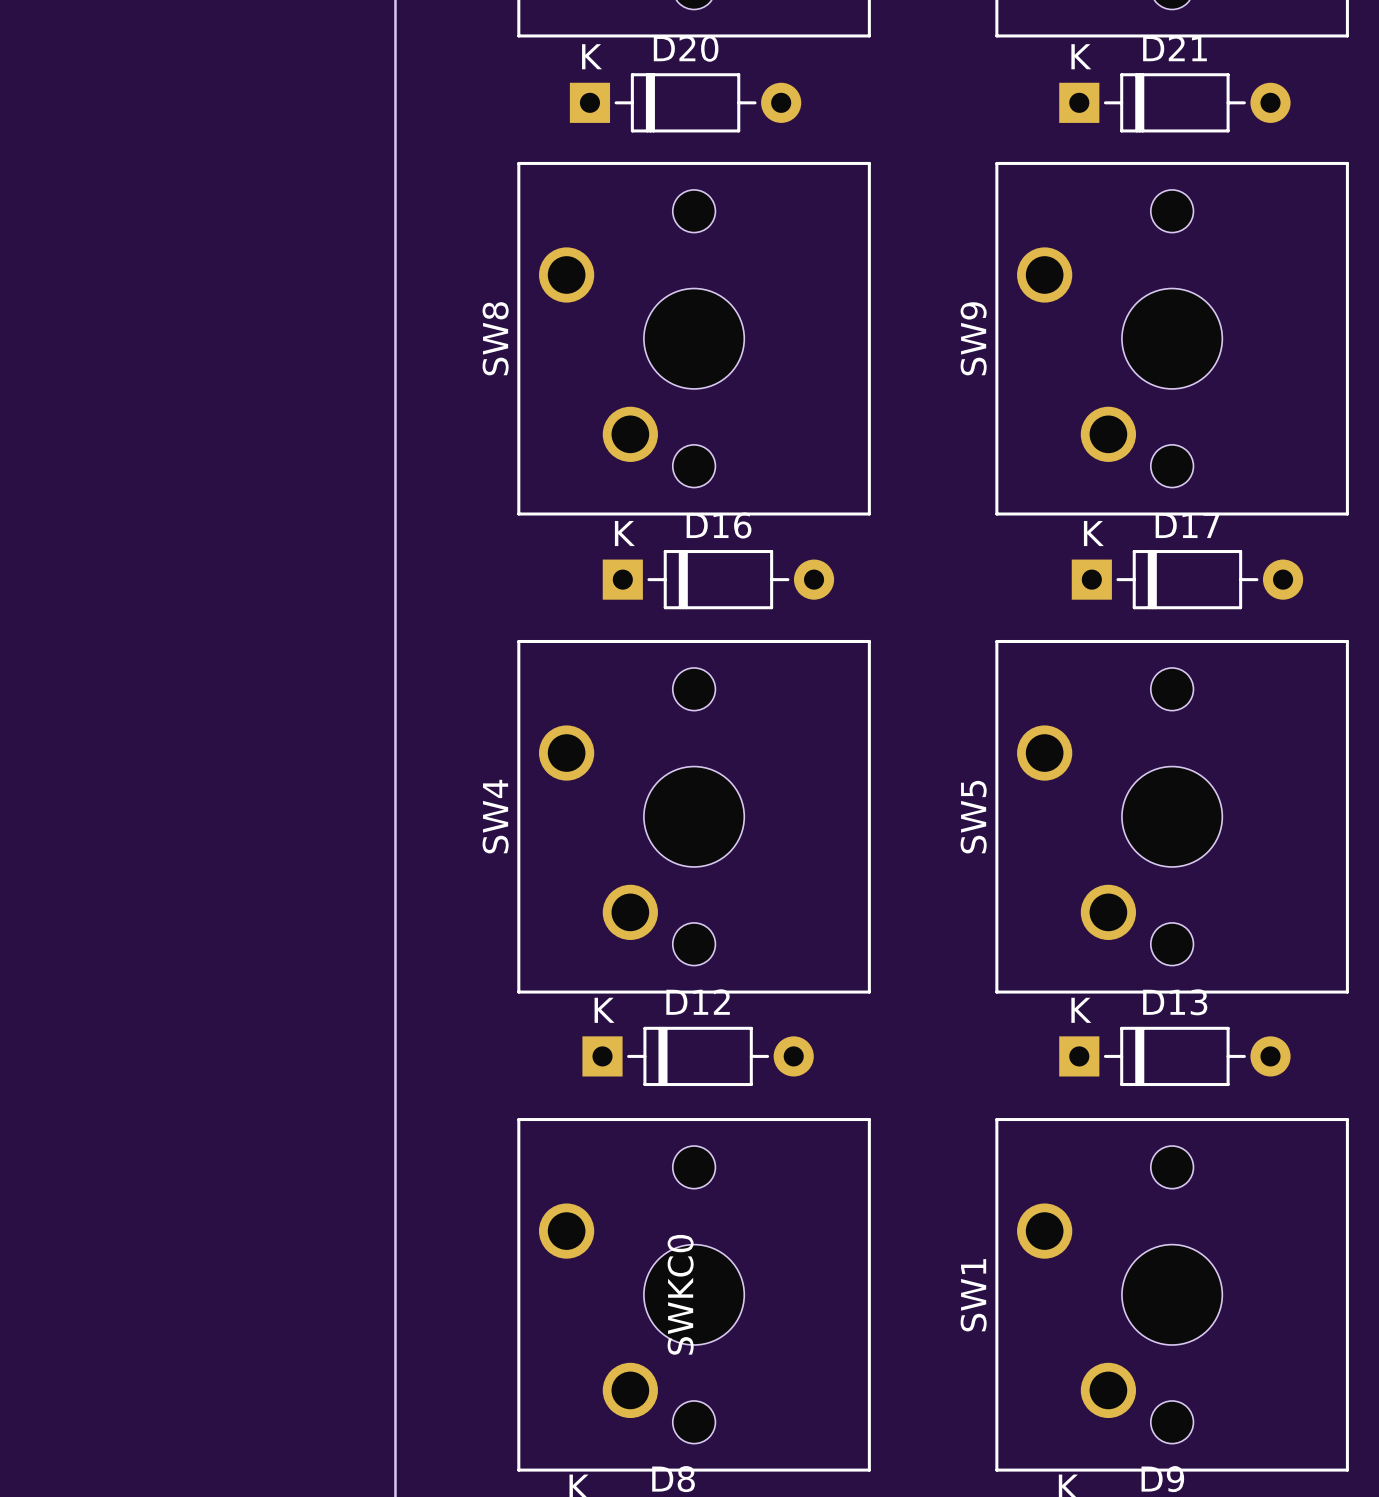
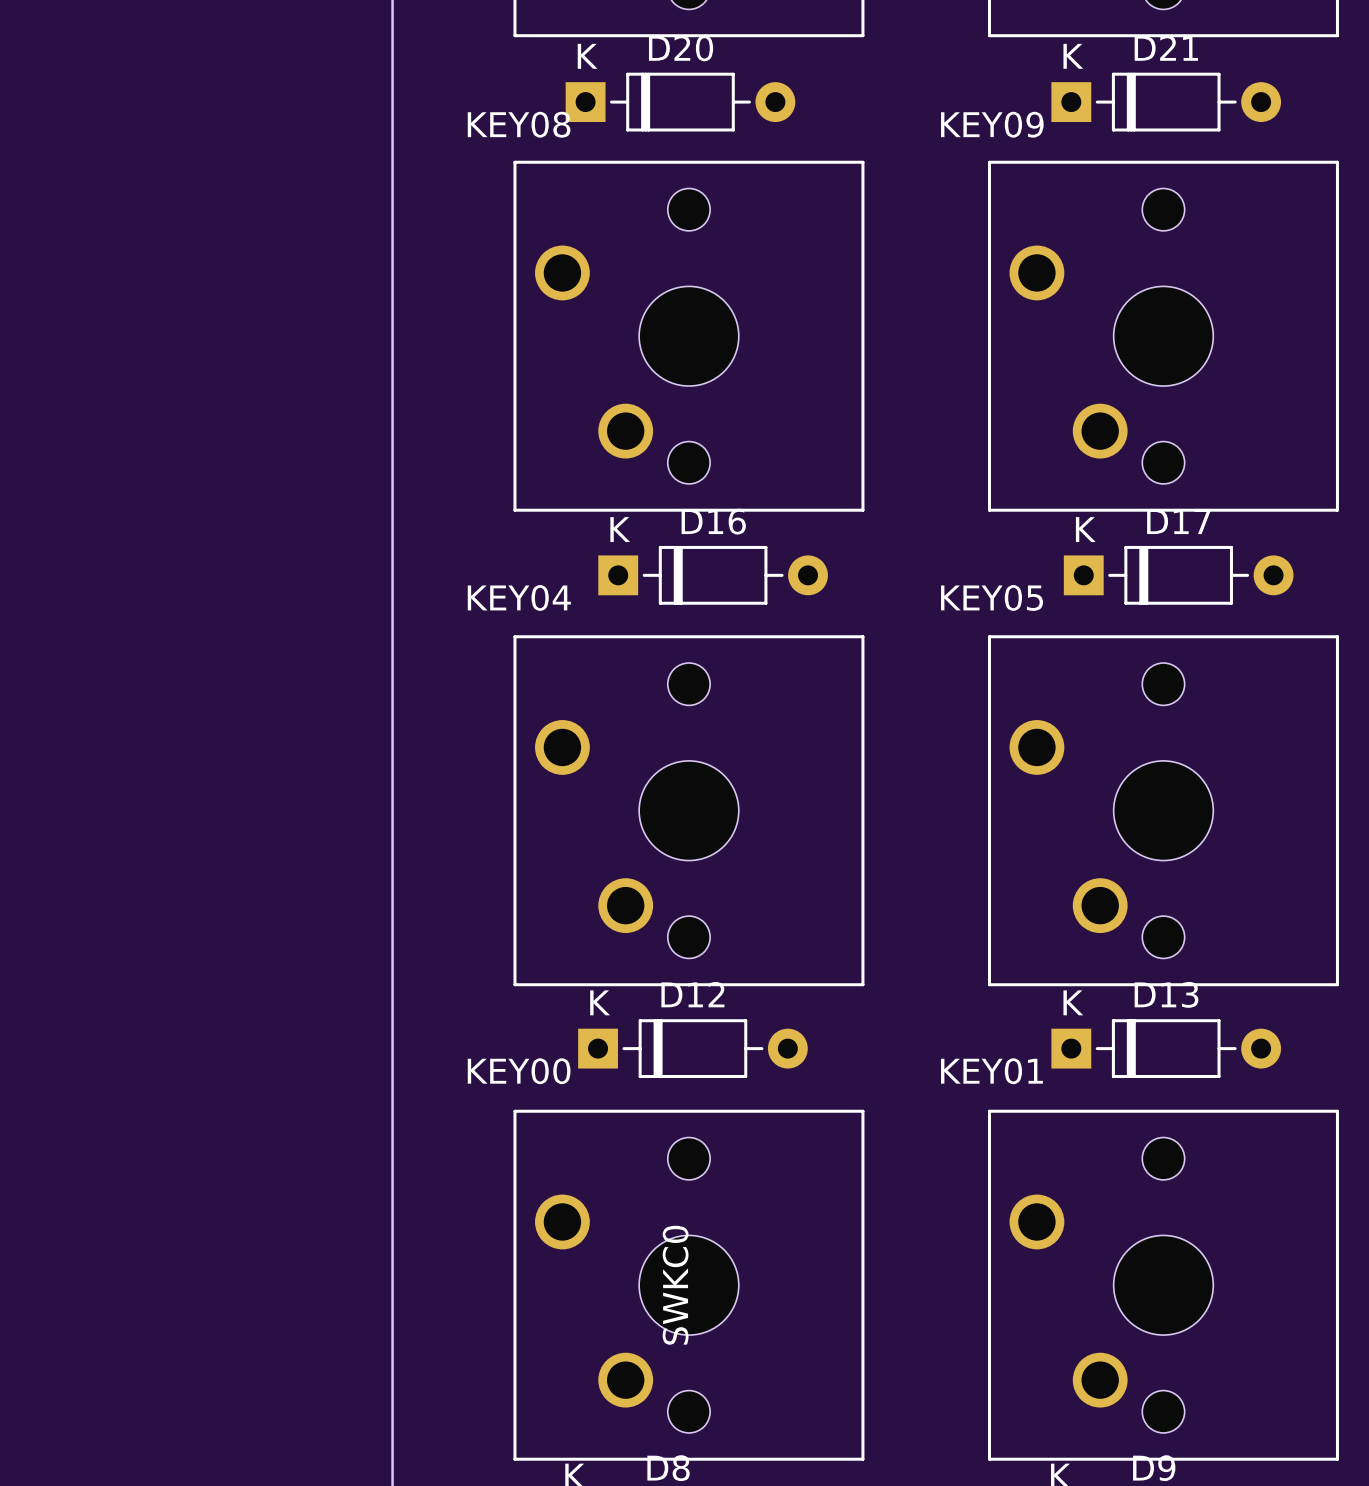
SW8 value: none -> KEY08 (519, 124)
SW9 value: none -> KEY09 (992, 124)
SW8 name: SW8 (495, 338) -> none
SW9 name: SW9 (973, 338) -> none
SW4 value: none -> KEY04 (519, 597)
SW5 value: none -> KEY05 (992, 597)
SW4 name: SW4 (495, 816) -> none
SW5 name: SW5 (973, 817) -> none
part value: none -> KEY00 (519, 1071)
SW1 value: none -> KEY01 (991, 1071)
SW1 name: SW1 (973, 1295) -> none

